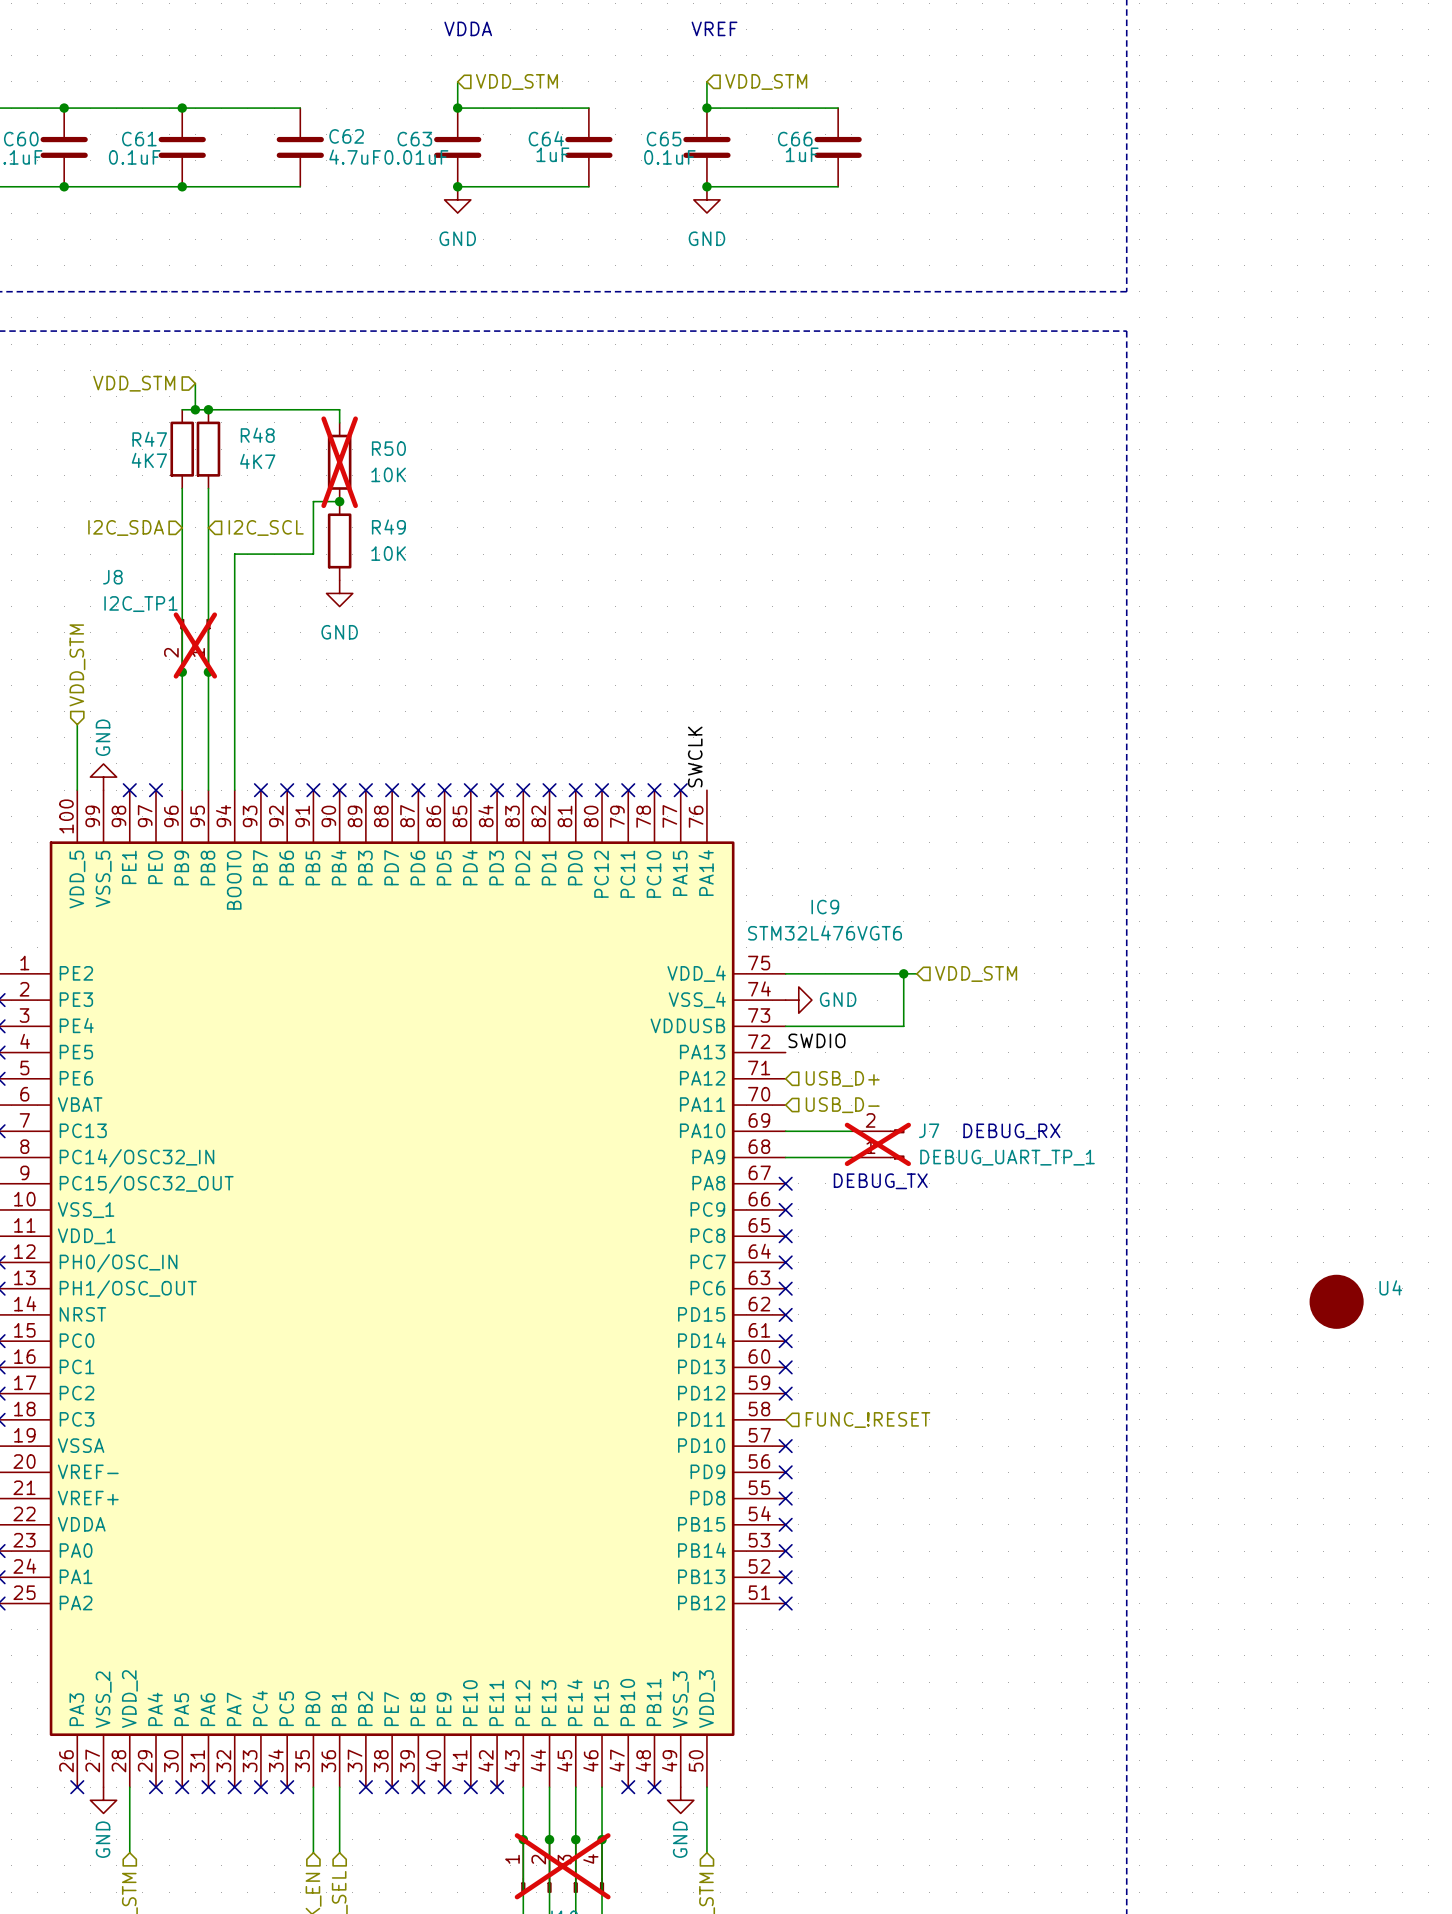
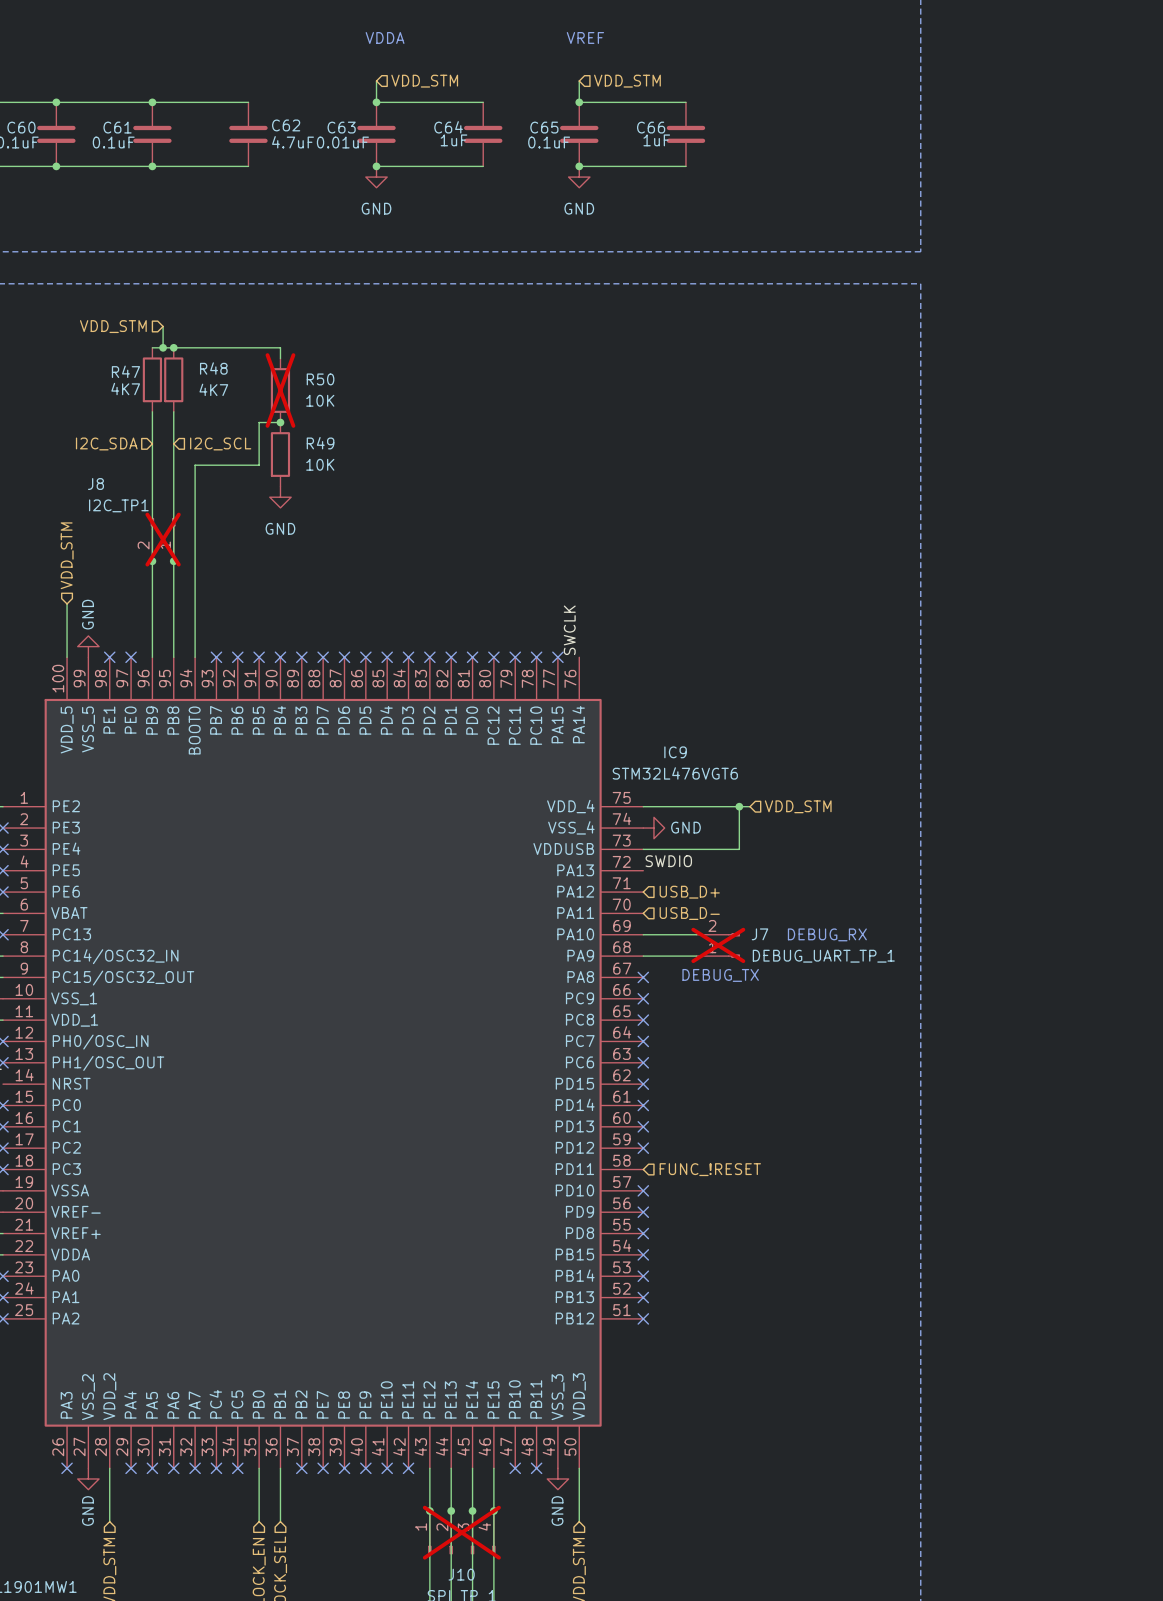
U4: (1336, 1301) -> none

